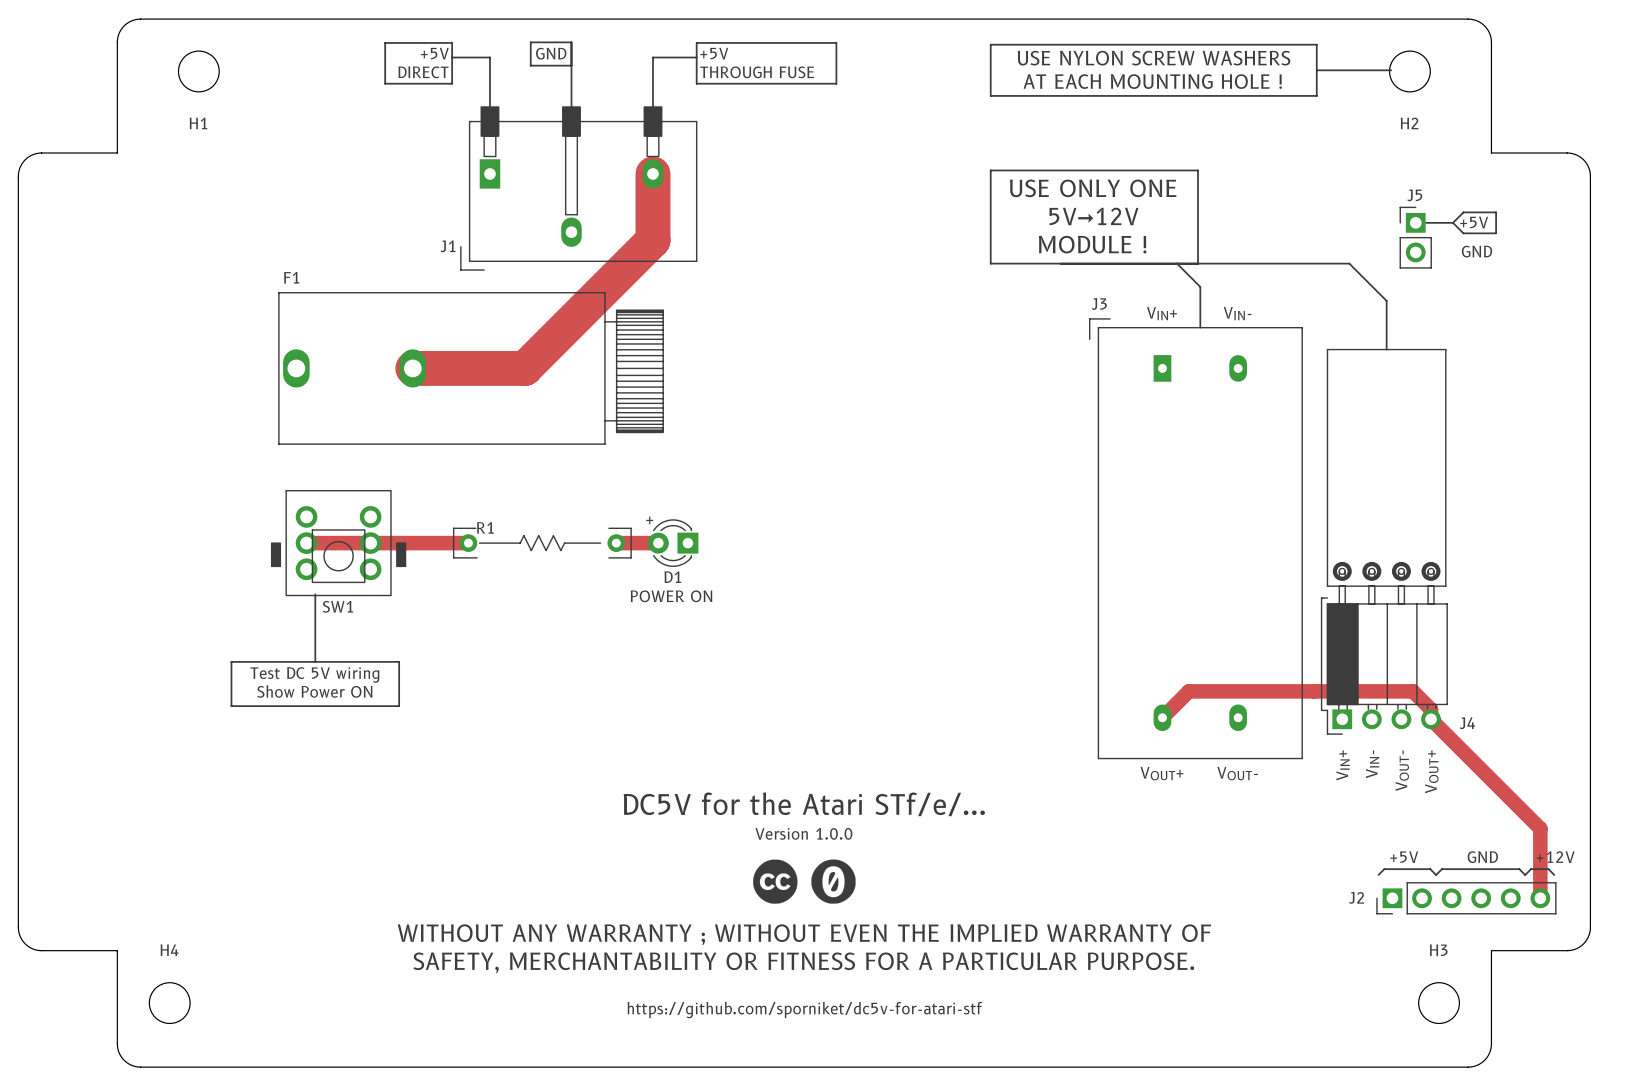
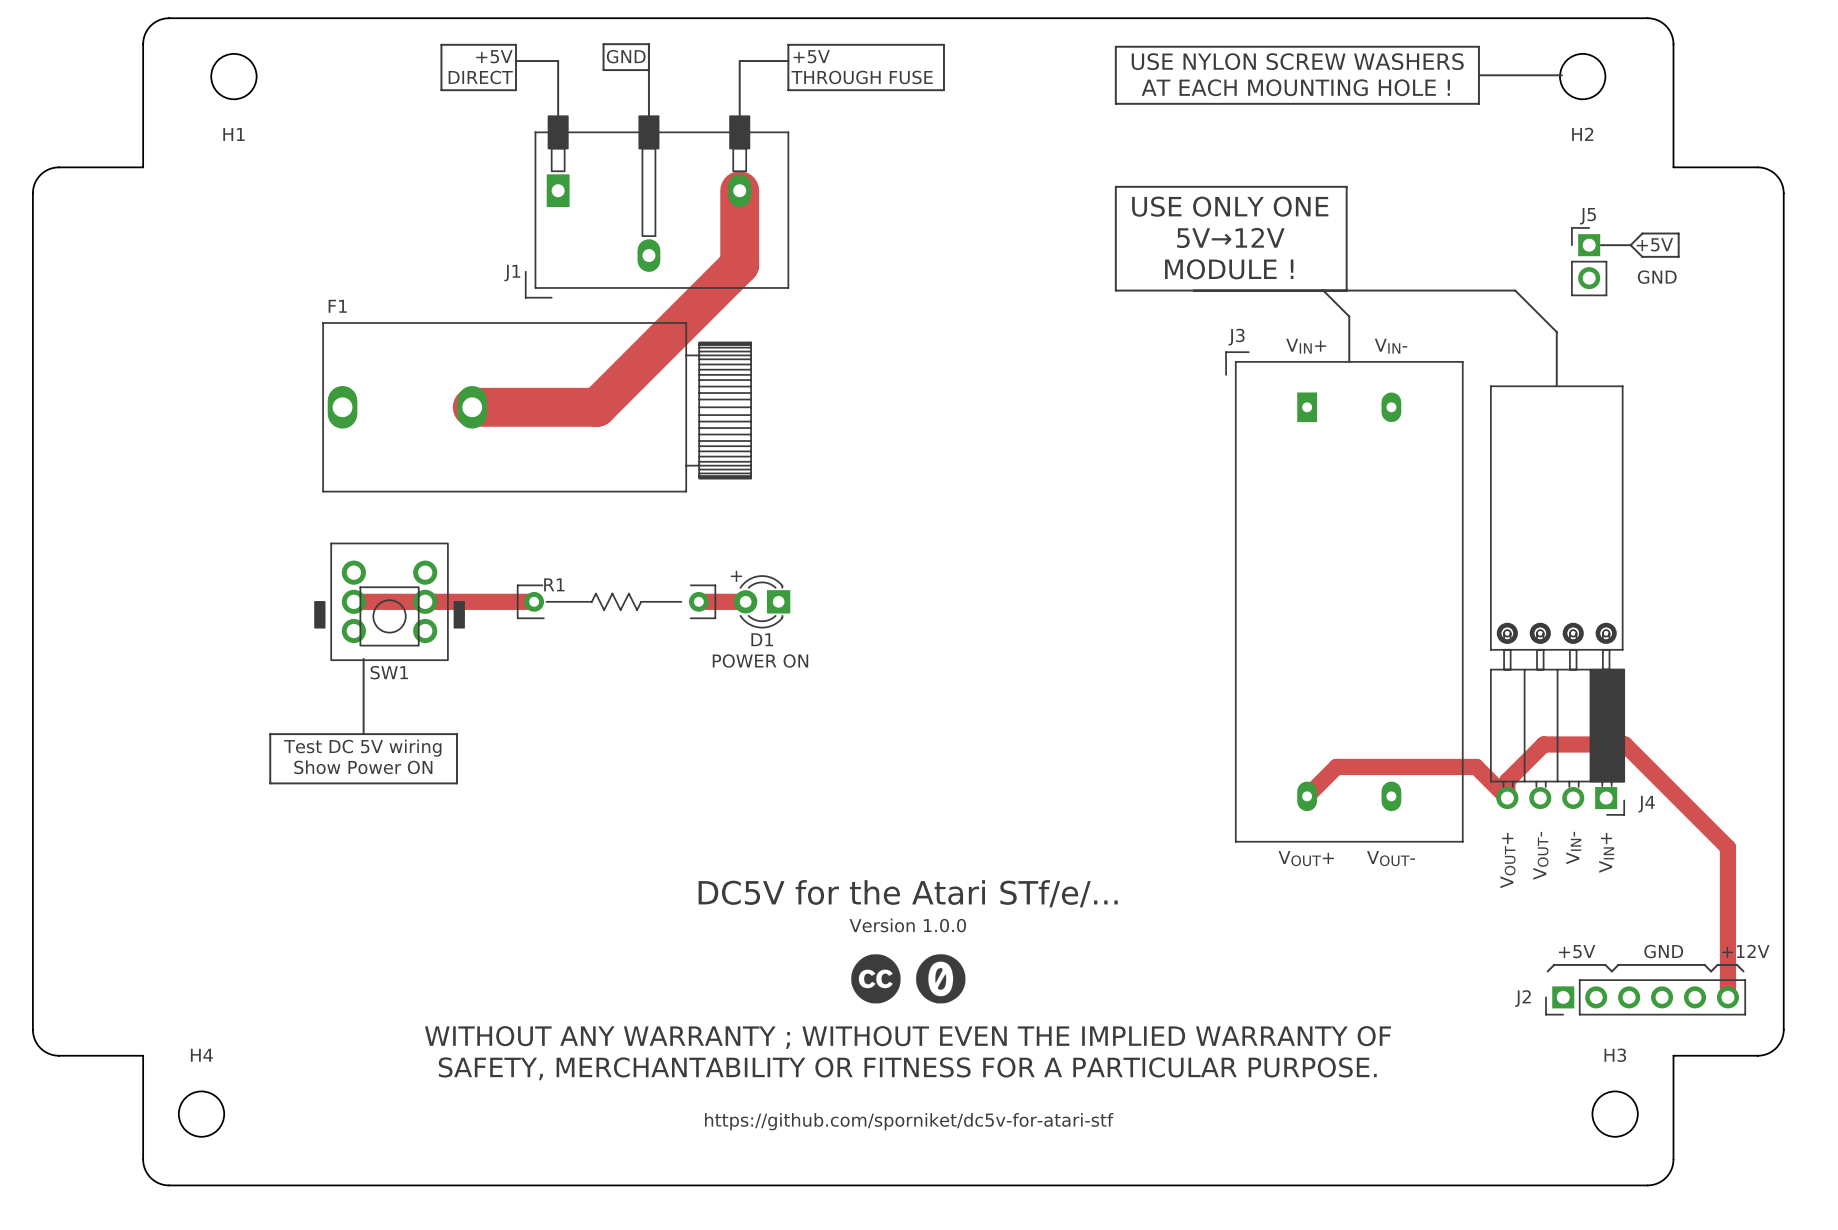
J4 footprint: [1320, 348, 1448, 735] -> [1490, 385, 1625, 816]
track: (1314, 691) (1412, 691) (1431, 709) (1431, 719) (1540, 828) -> (1476, 766) (1507, 798) (1507, 780) (1543, 744) (1624, 744) (1727, 847) (1727, 919)

